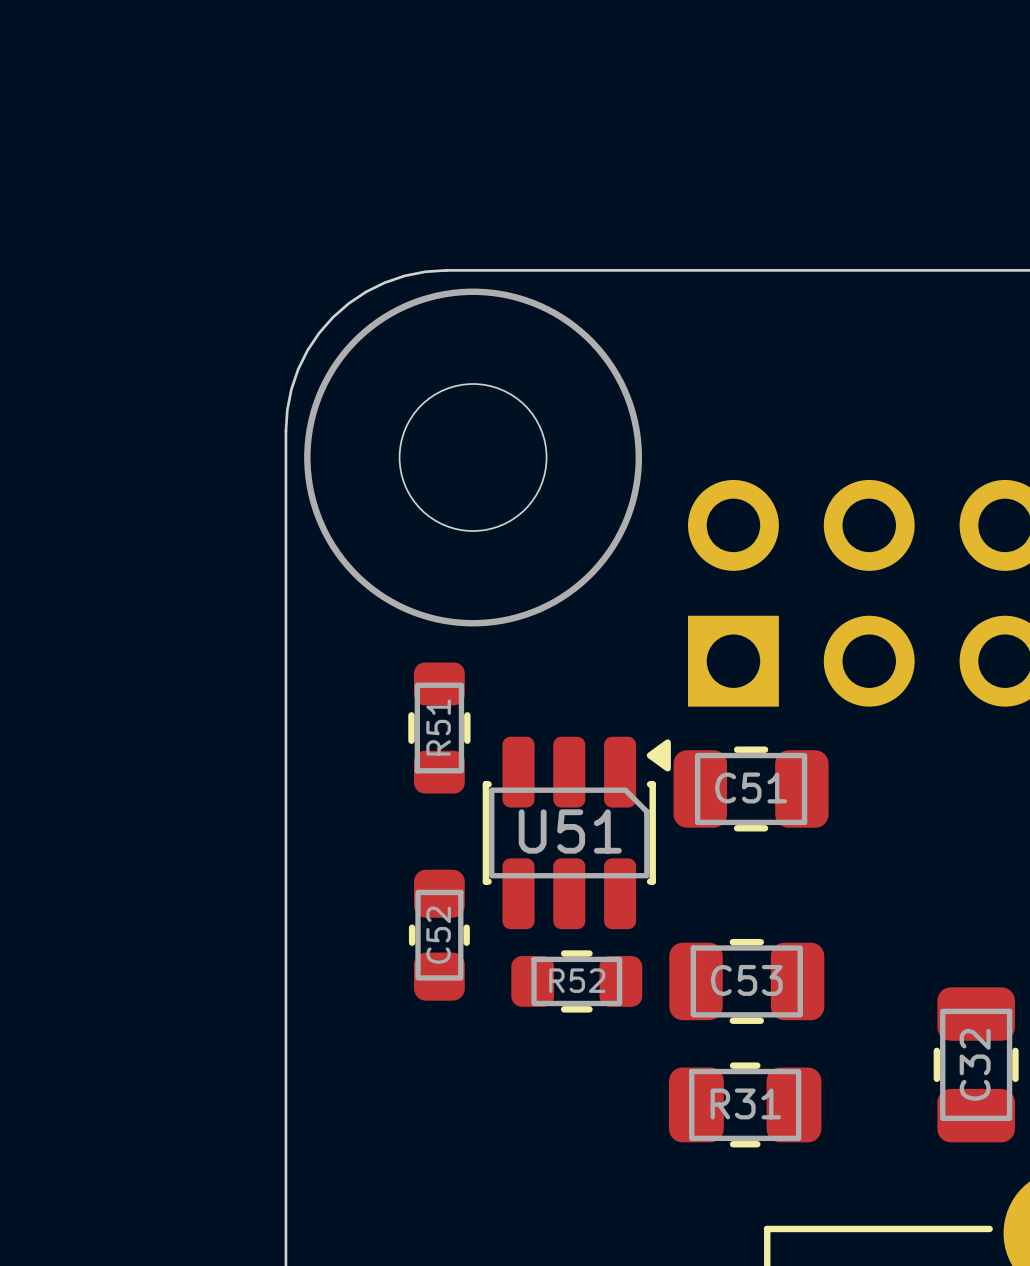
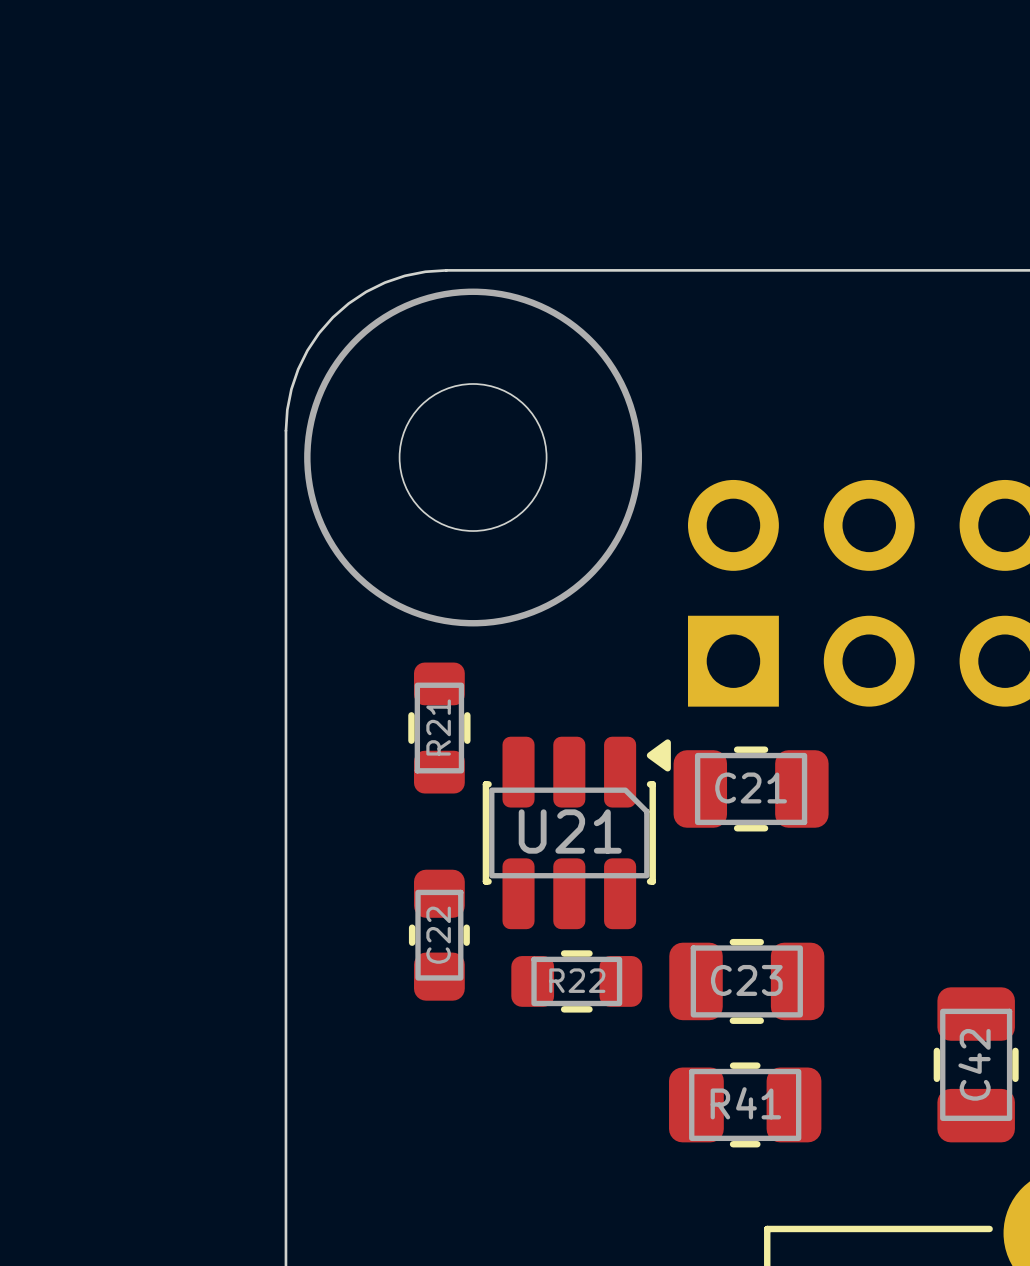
R51 name: R51 (438, 727) -> R21 (438, 727)
C51 name: C51 (751, 787) -> C21 (751, 787)
U51 name: U51 (570, 831) -> U21 (570, 831)
C52 name: C52 (438, 935) -> C22 (438, 935)
R52 name: R52 (577, 980) -> R22 (577, 980)
C53 name: C53 (746, 980) -> C23 (746, 980)
C32 name: C32 (975, 1064) -> C42 (974, 1064)
R31 name: R31 (745, 1103) -> R41 (745, 1103)

